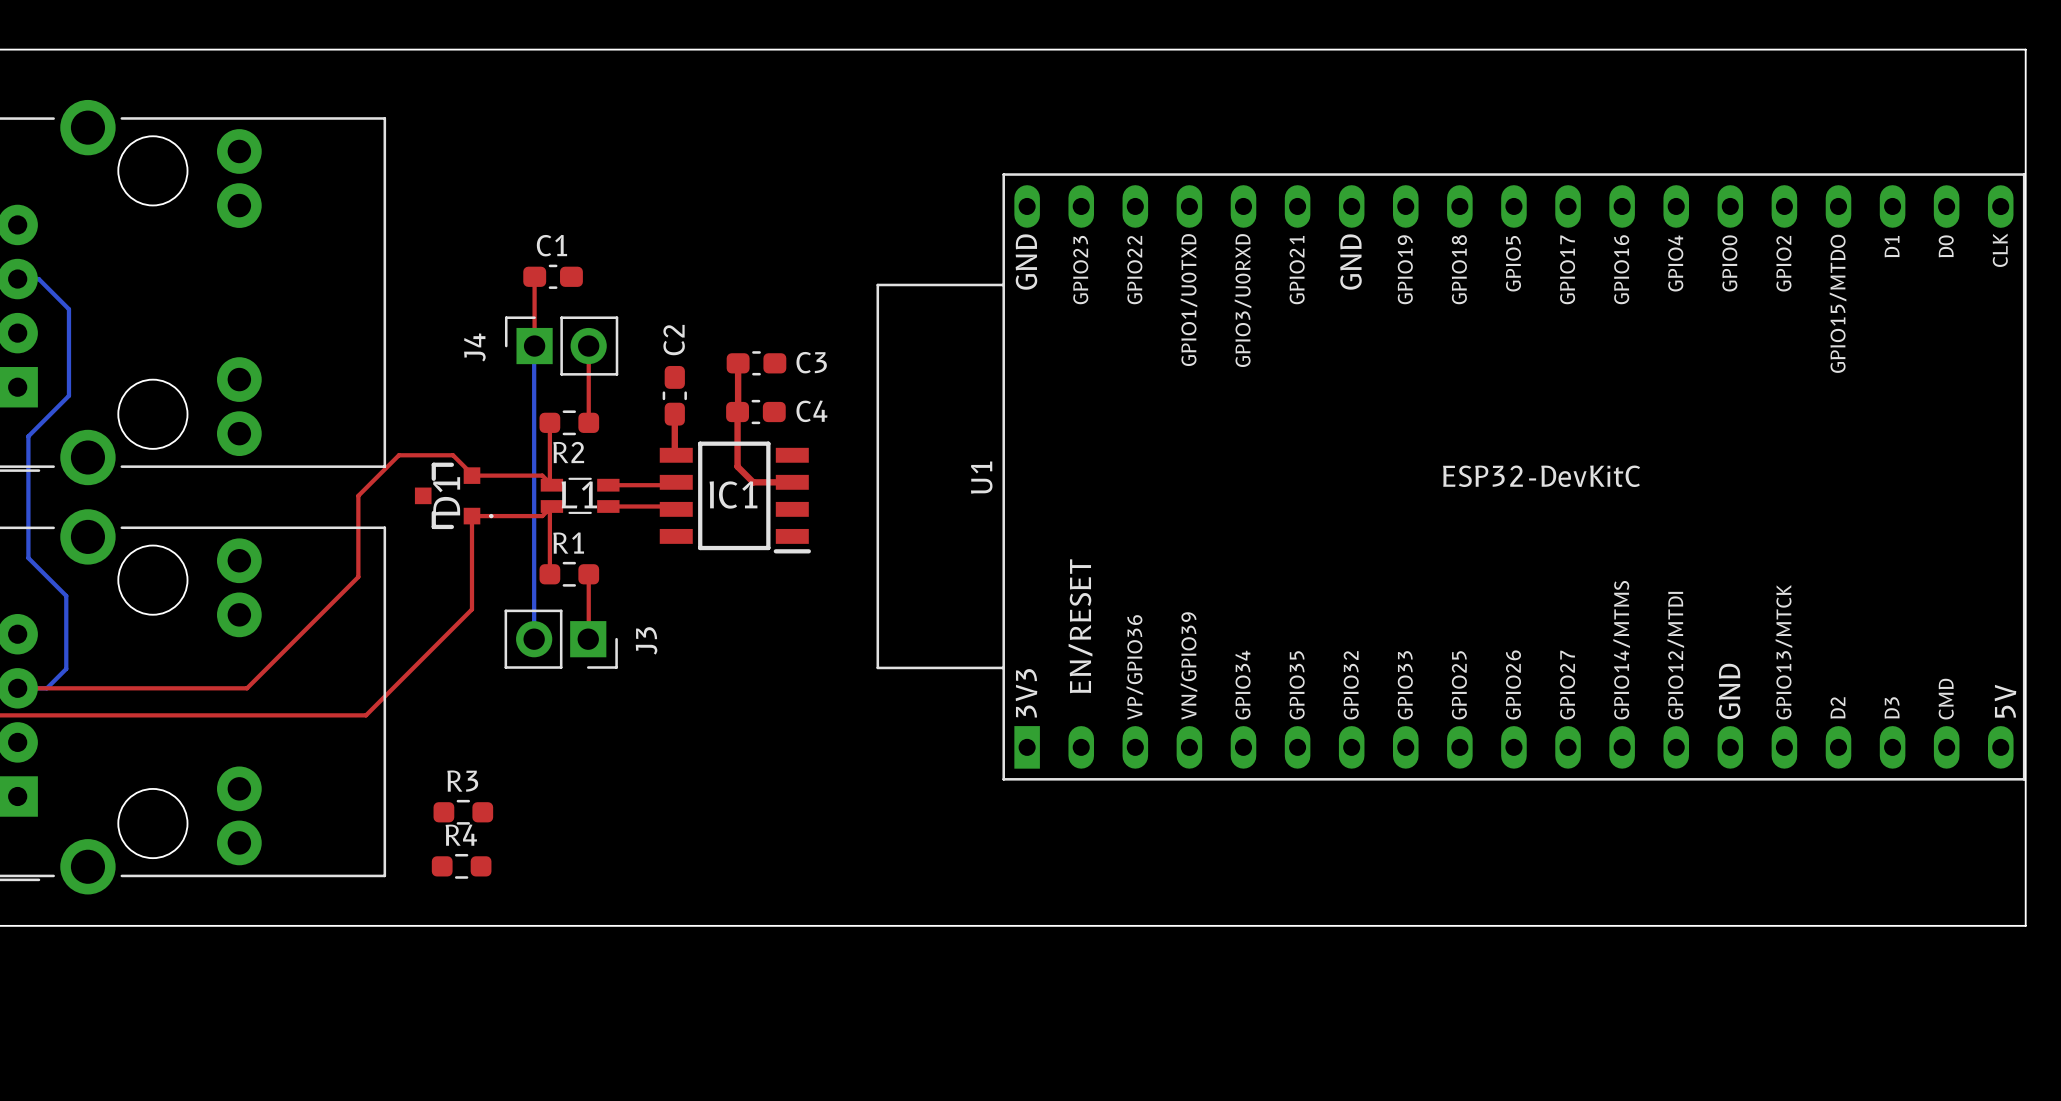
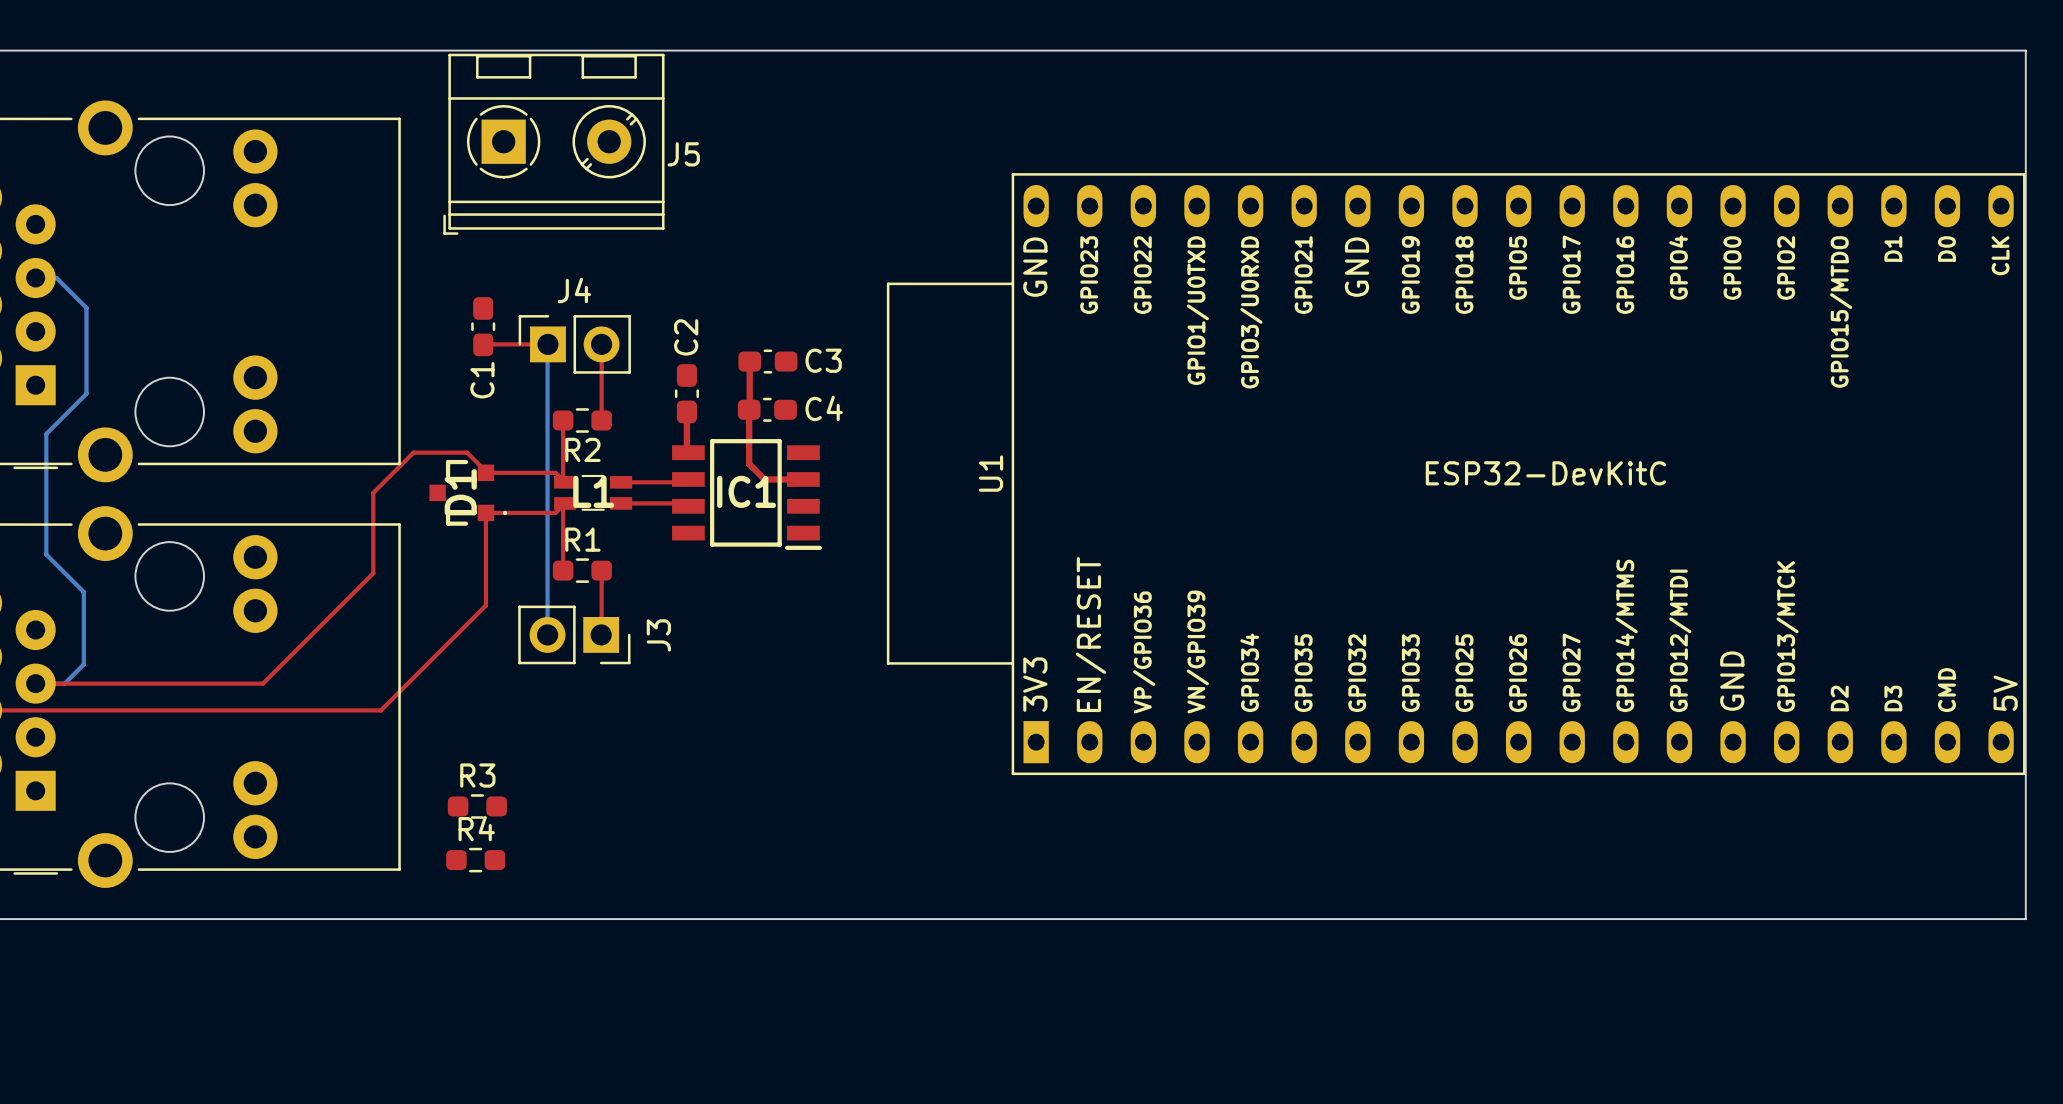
J5: none -> (553, 144)
C1 name position: C1 (551, 245) -> C1 (482, 380)
top track: (534, 276) (534, 346) -> (483, 344) (547, 344)
C1 rotation: 0° (553, 276) -> 90° clockwise (483, 326)
C1 position: (553, 276) -> (483, 326)
J4 name rotation: 0° (474, 347) -> 90° clockwise (574, 290)
J4 name position: J4 (474, 347) -> J4 (574, 290)

